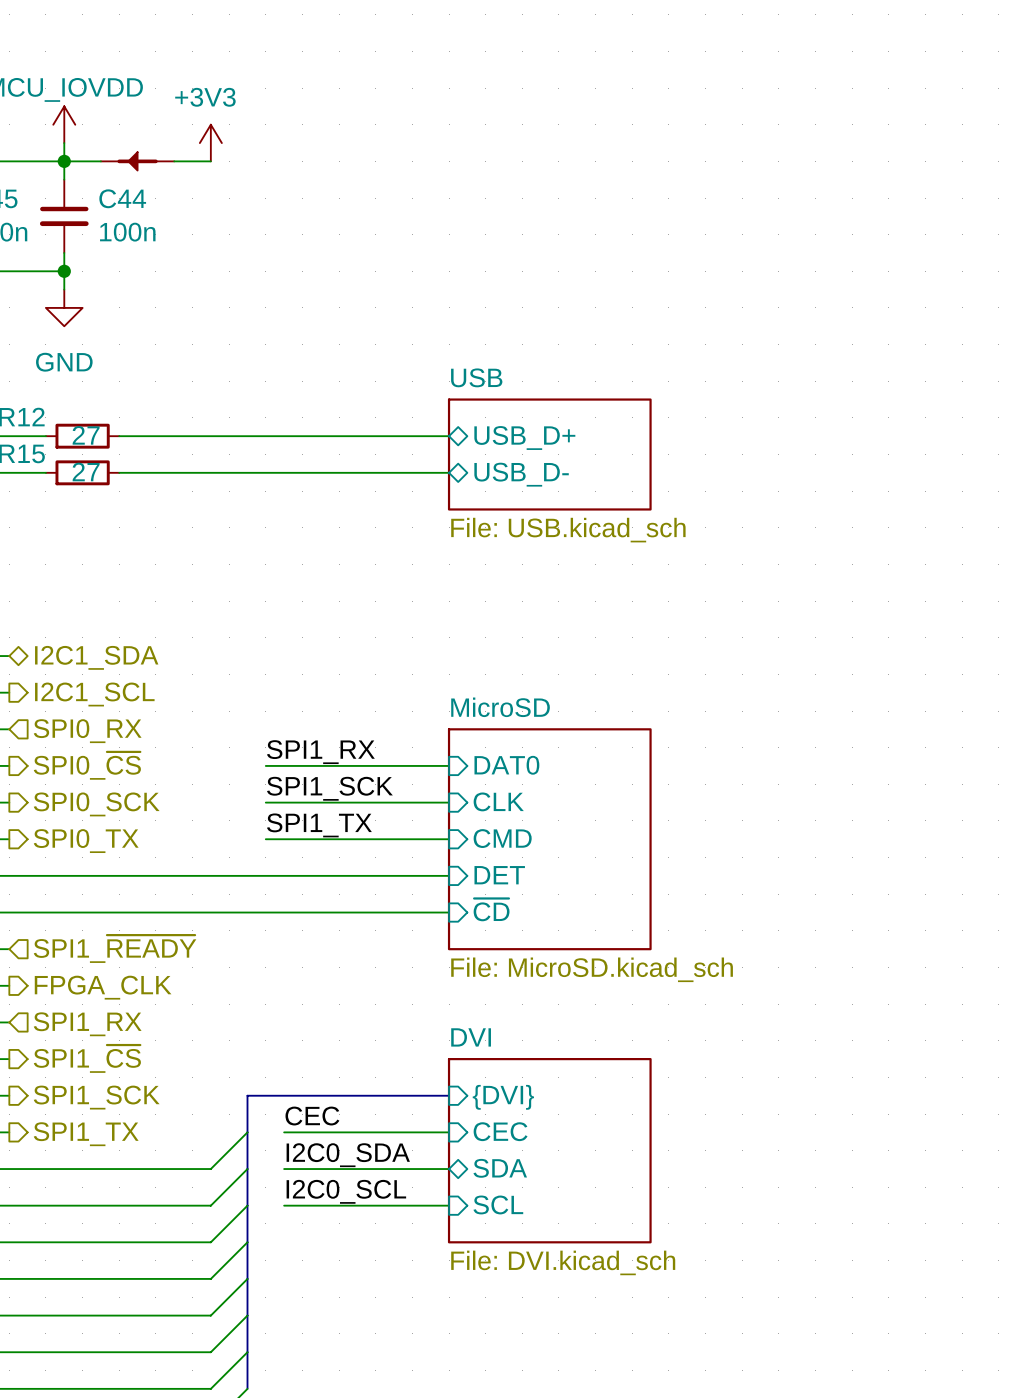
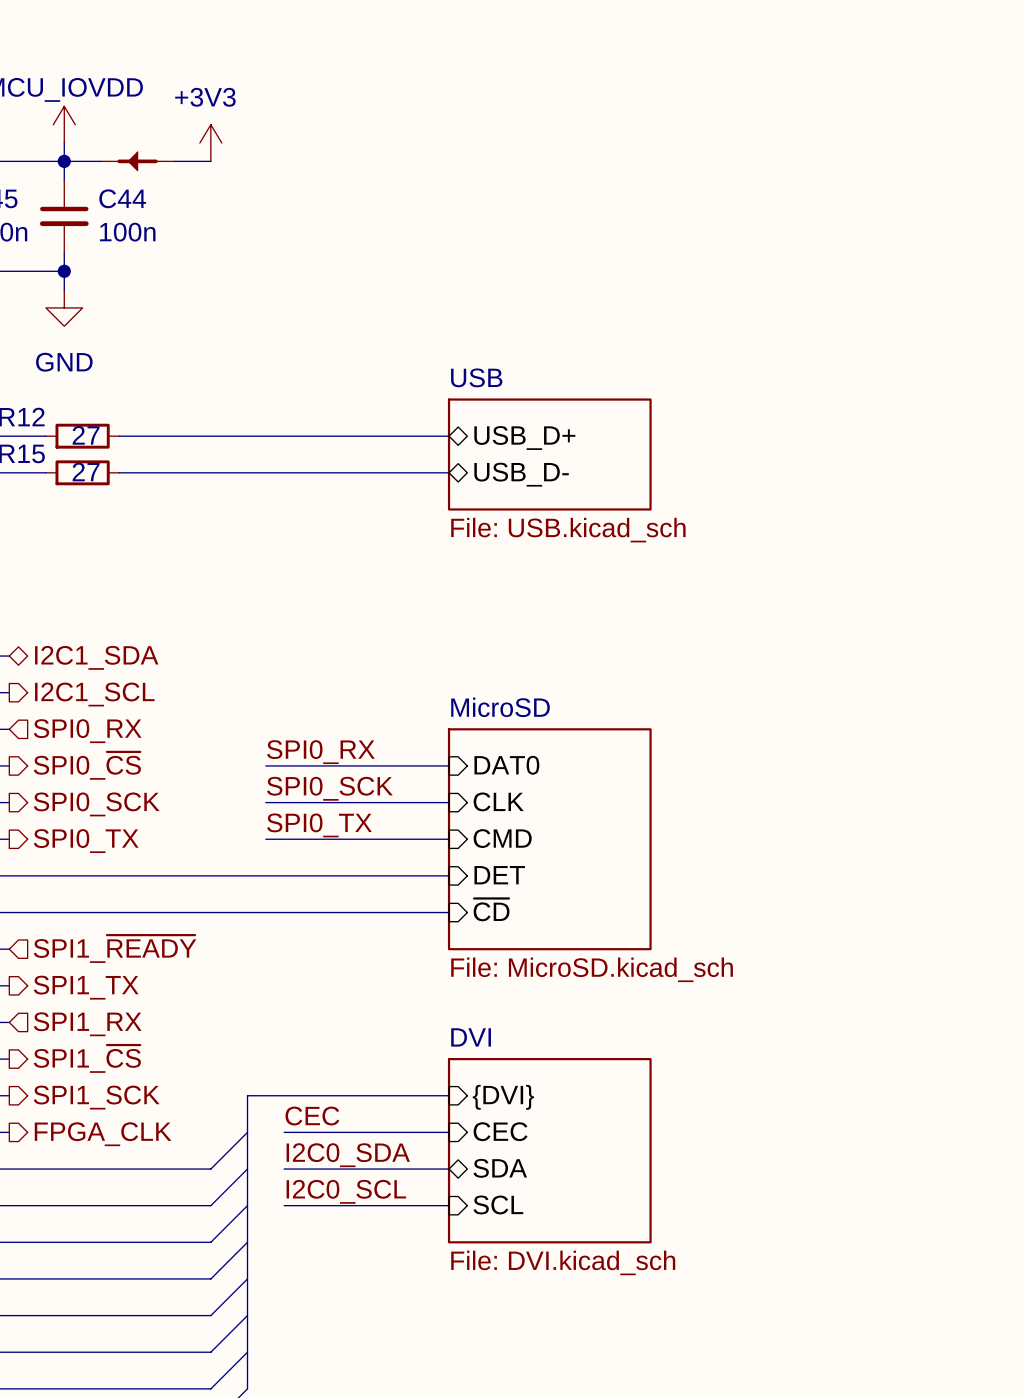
label: SPI1_RX (320, 752) -> SPI0_RX (320, 752)
label: SPI1_SCK (329, 788) -> SPI0_SCK (329, 788)
label: SPI1_TX (319, 825) -> SPI0_TX (319, 825)
hierarchical label: FPGA_CLK (103, 987) -> SPI1_TX (86, 987)
hierarchical label: SPI1_TX (86, 1134) -> FPGA_CLK (103, 1134)

